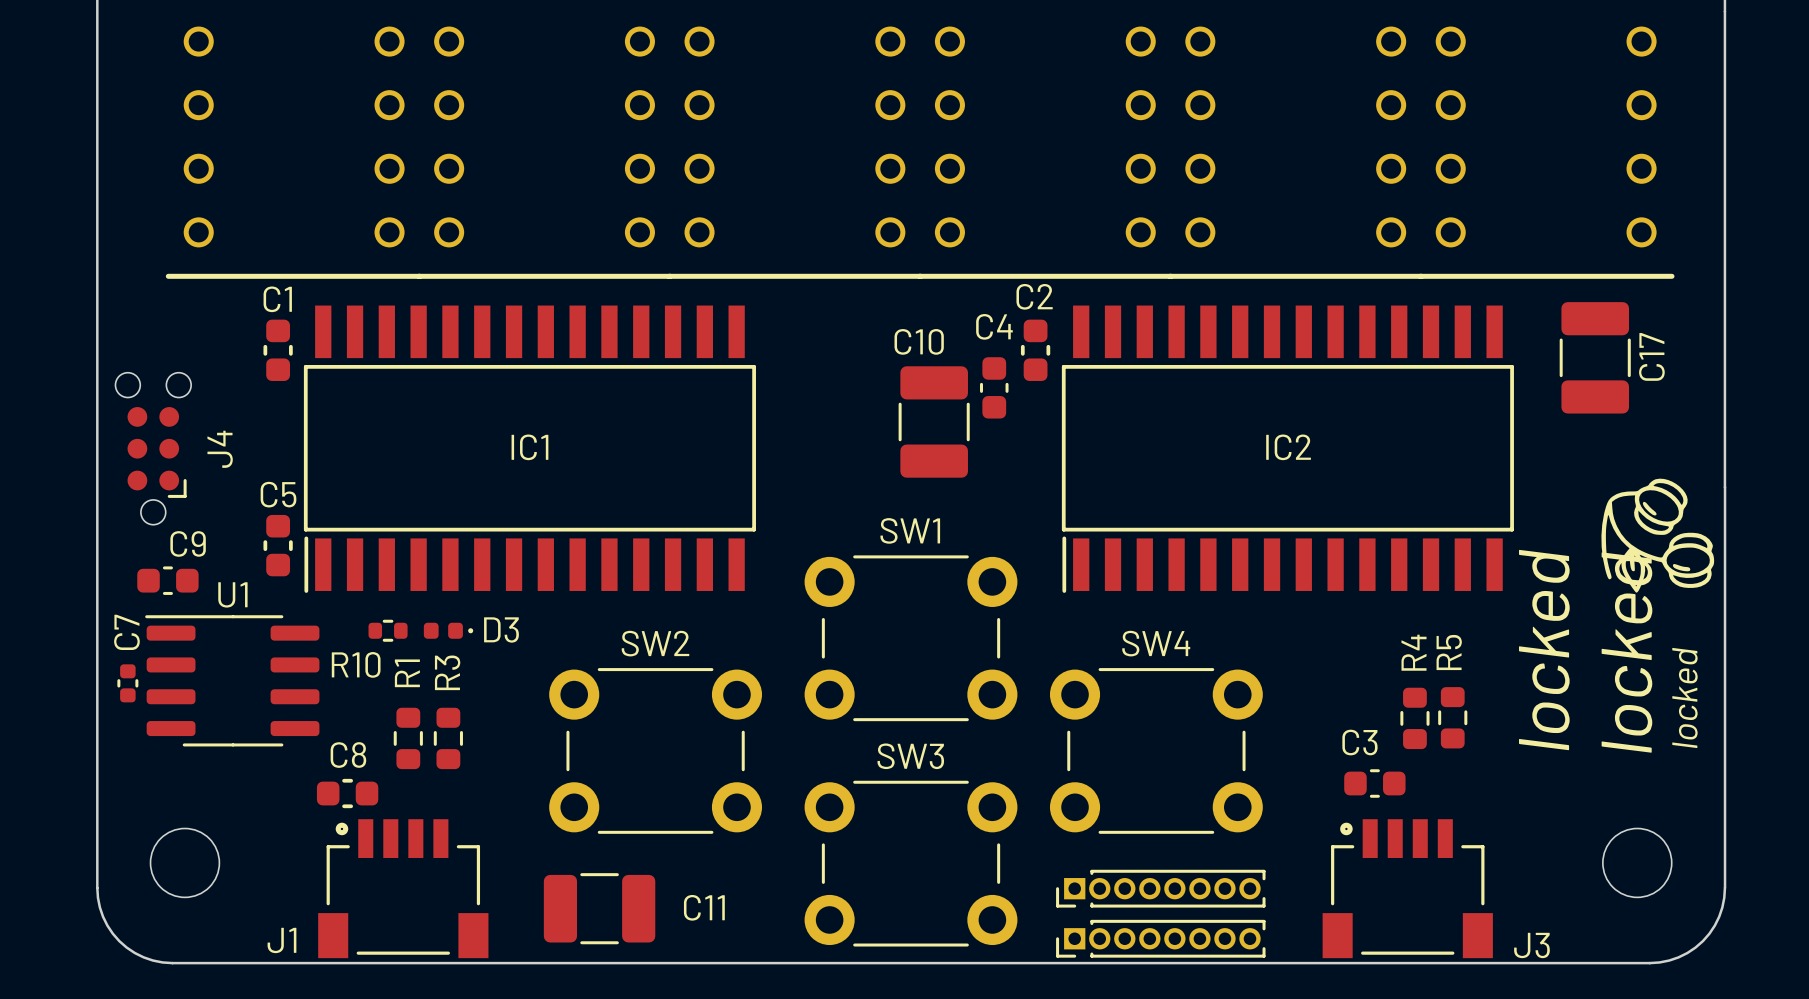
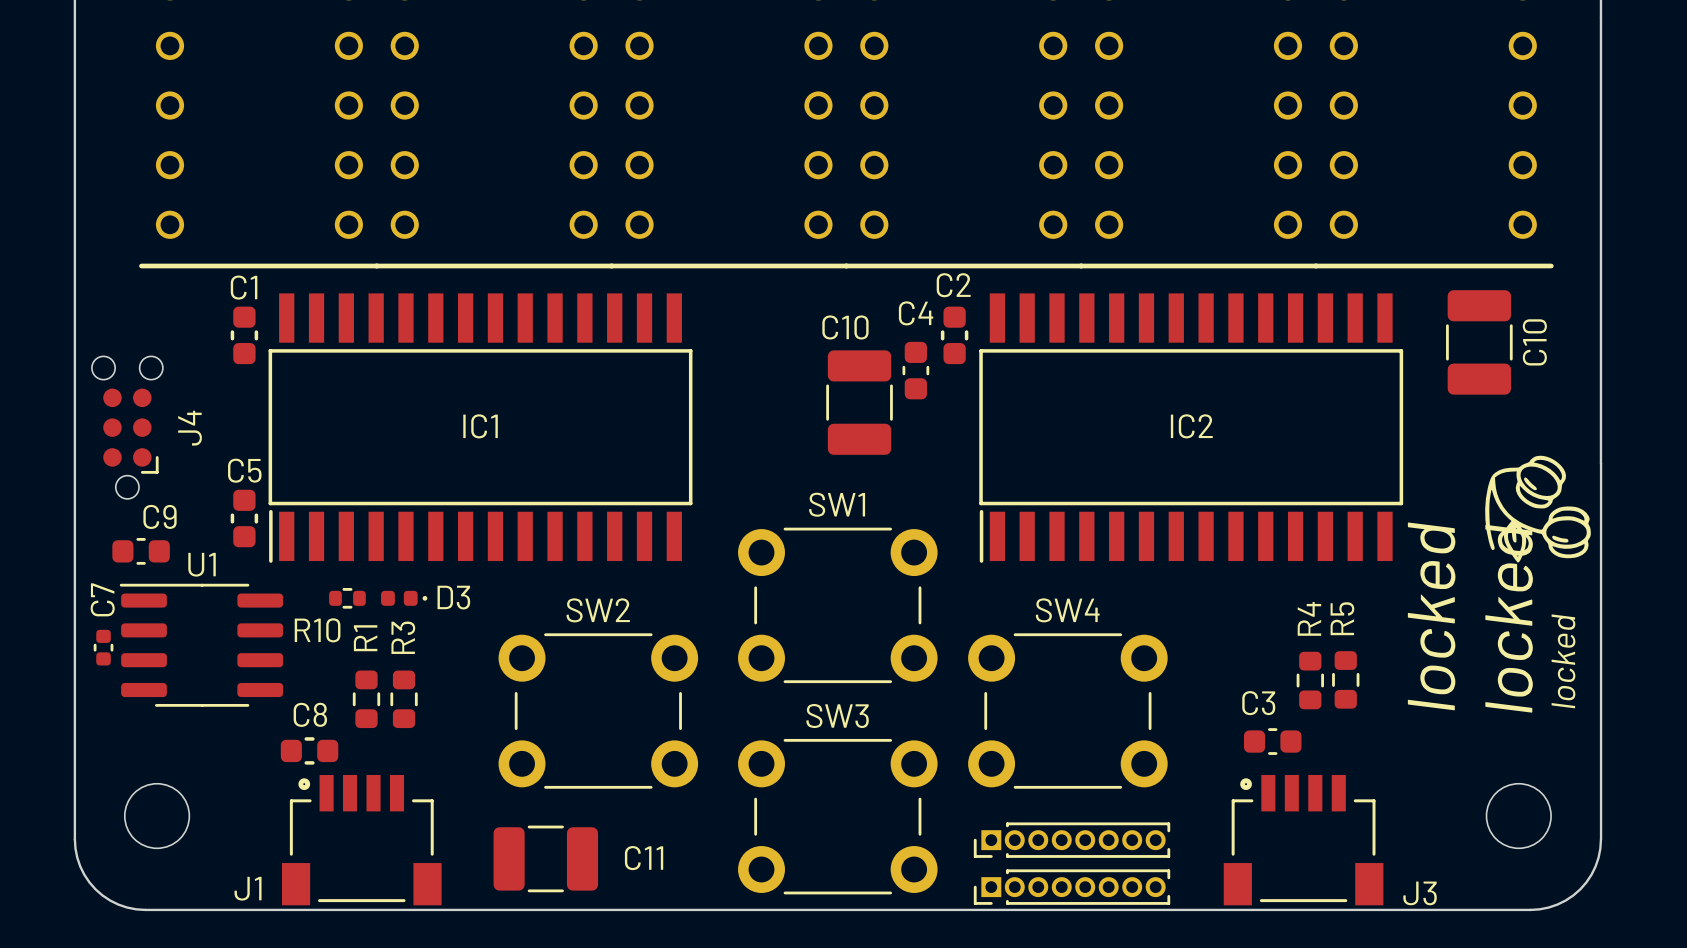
C17 name: C17 (1651, 356) -> C10 (1534, 342)

